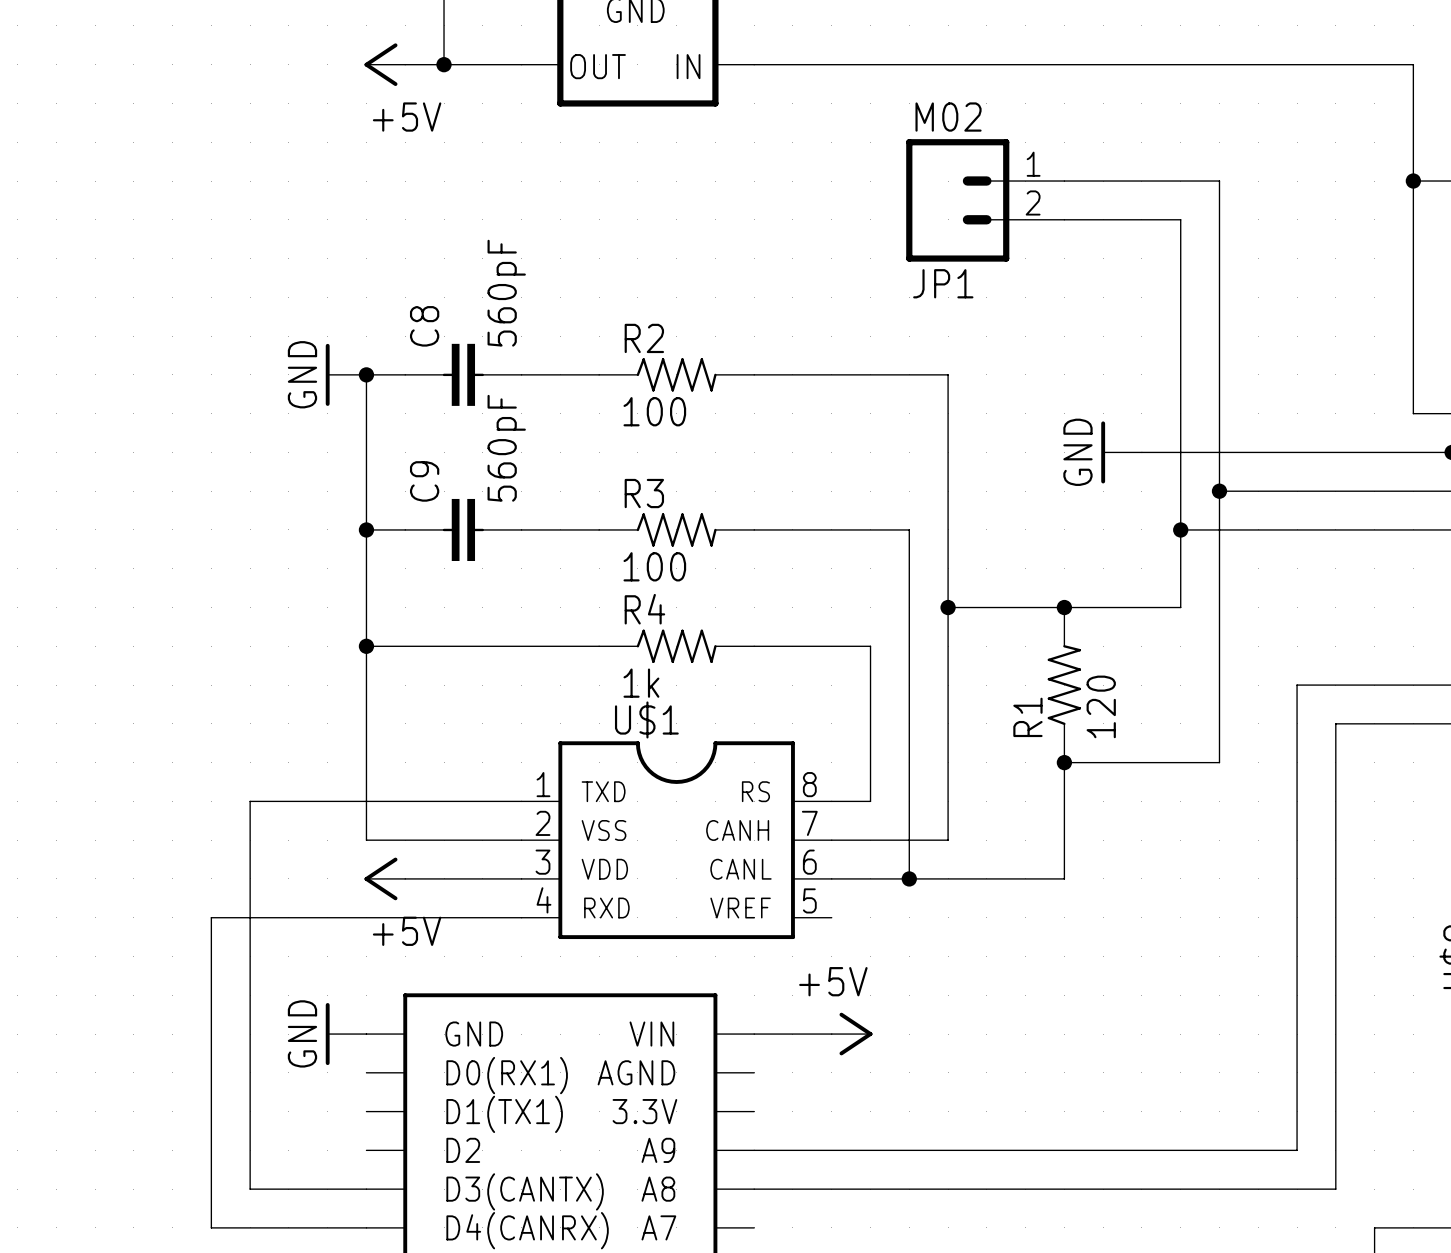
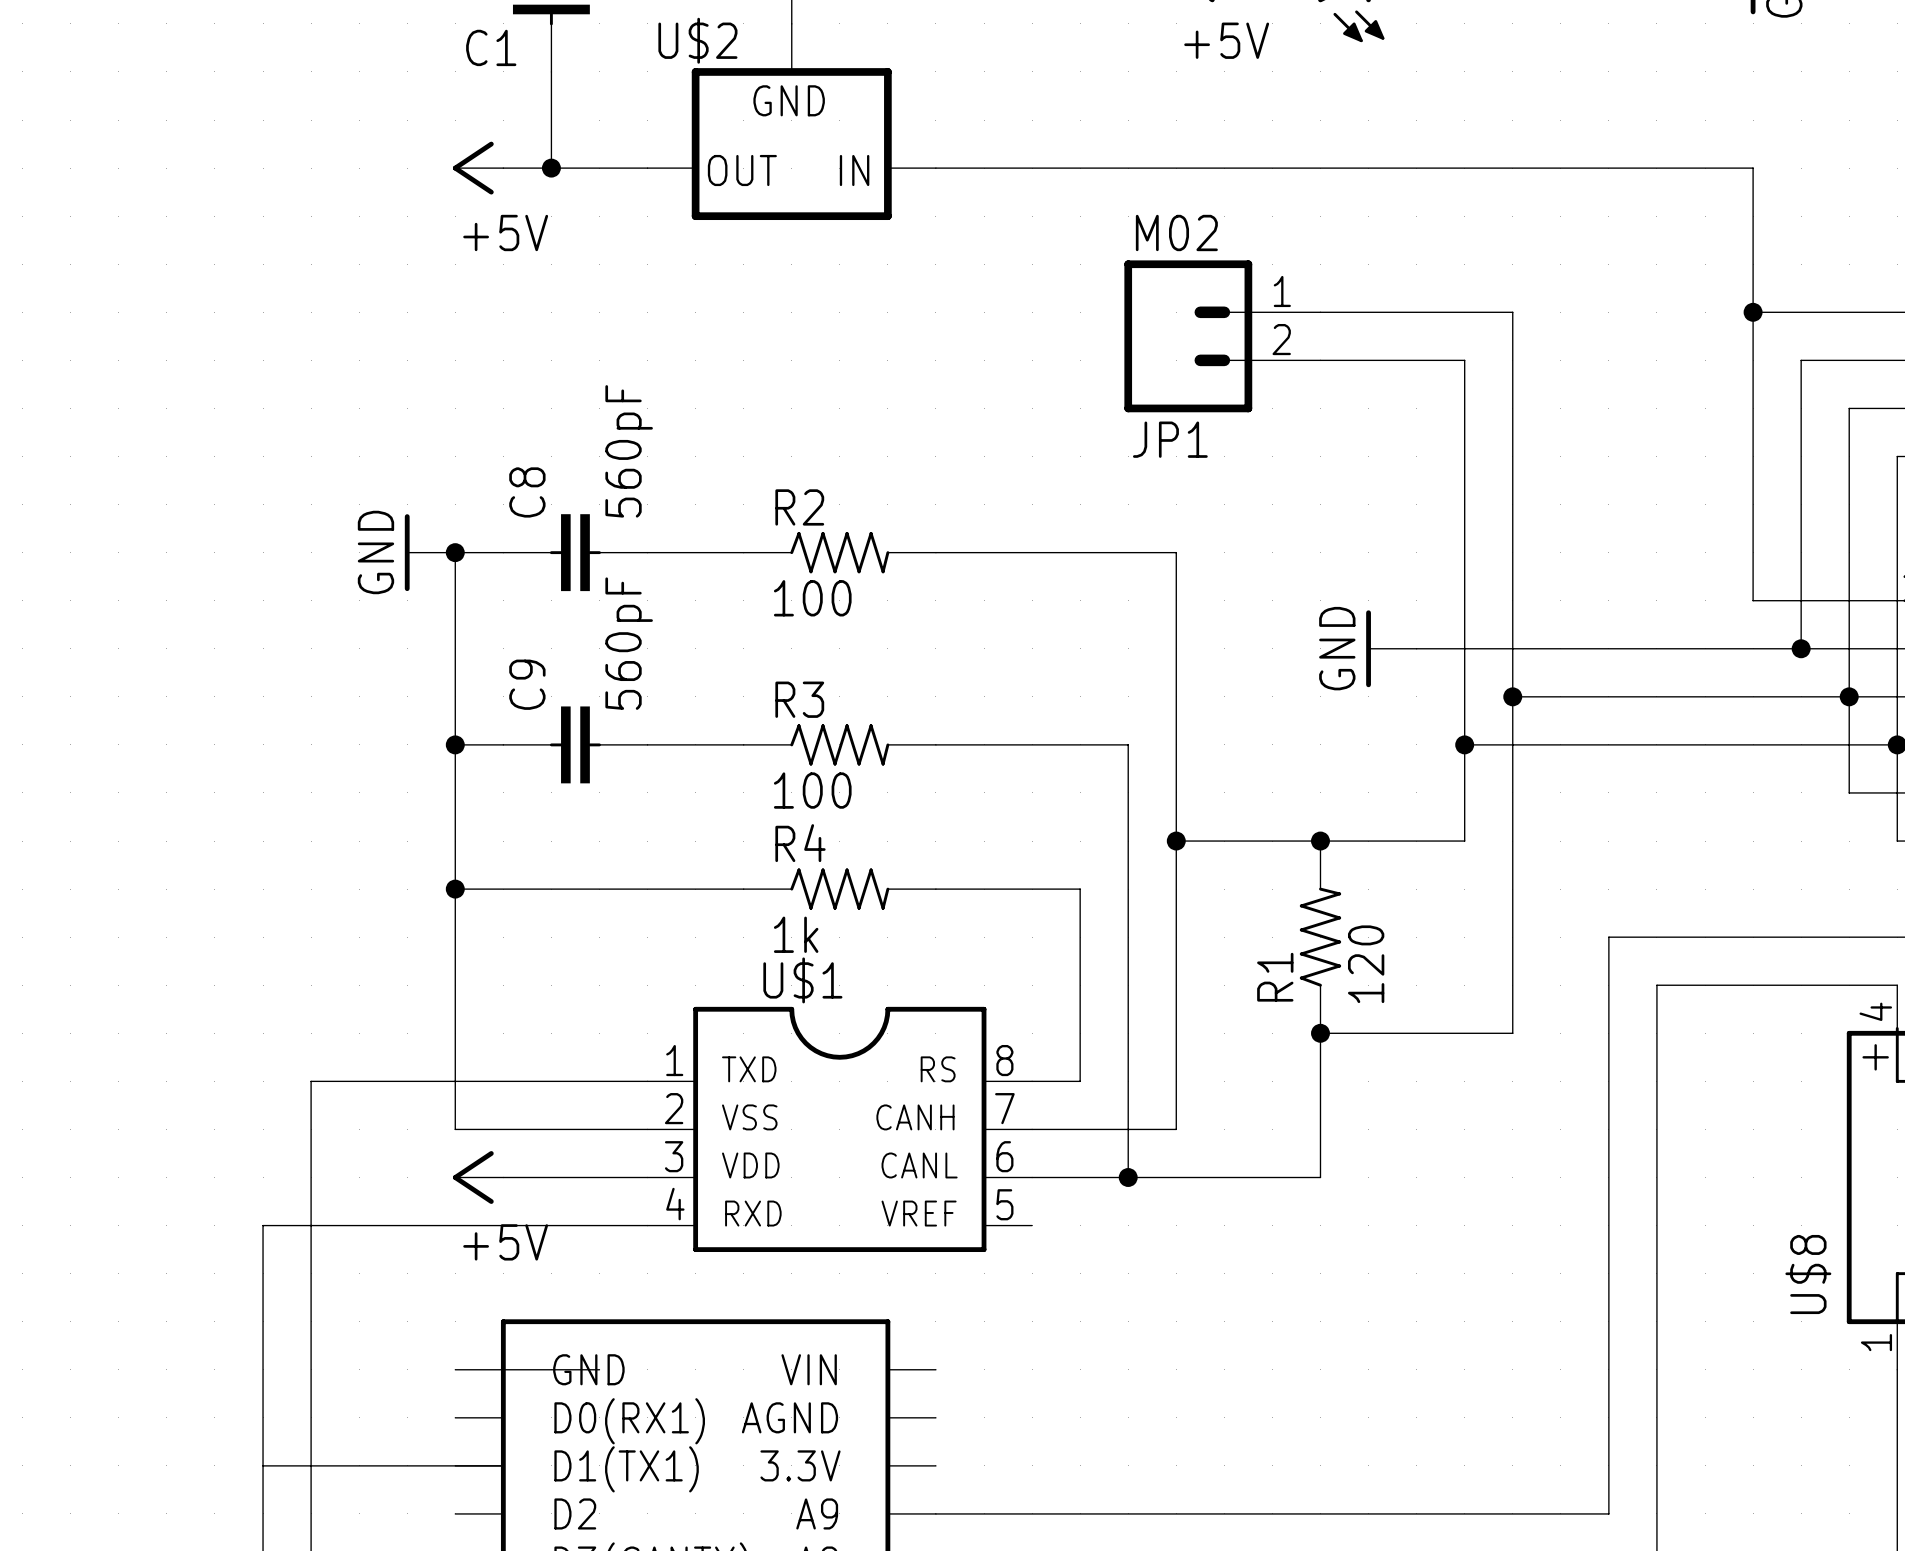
power symbol: GND (346, 1034) -> none
wire: (754, 1034) (831, 1034) -> (503, 1369) (599, 1369)
power symbol: +5V (852, 1034) -> none
wire: none -> (263, 1465) (503, 1465)

